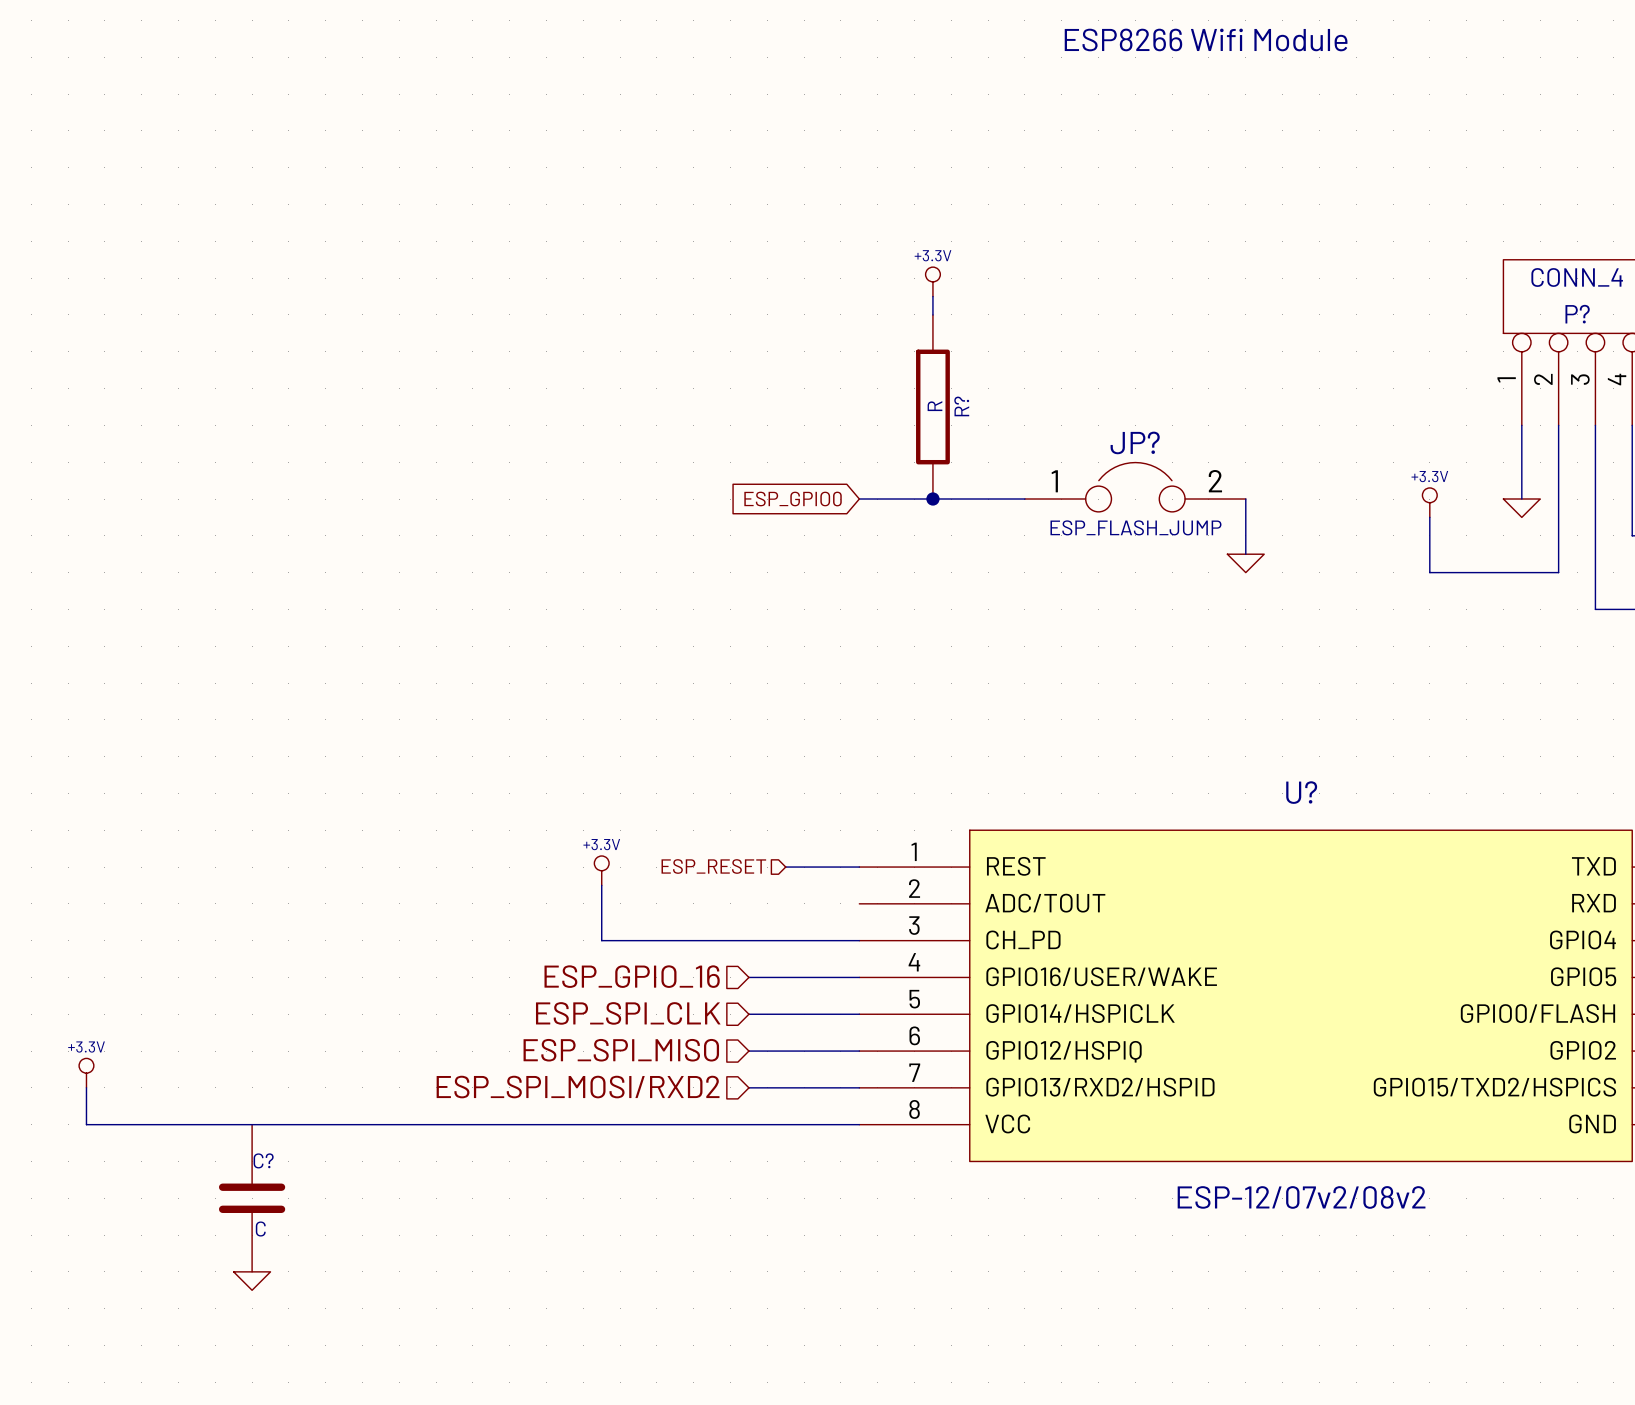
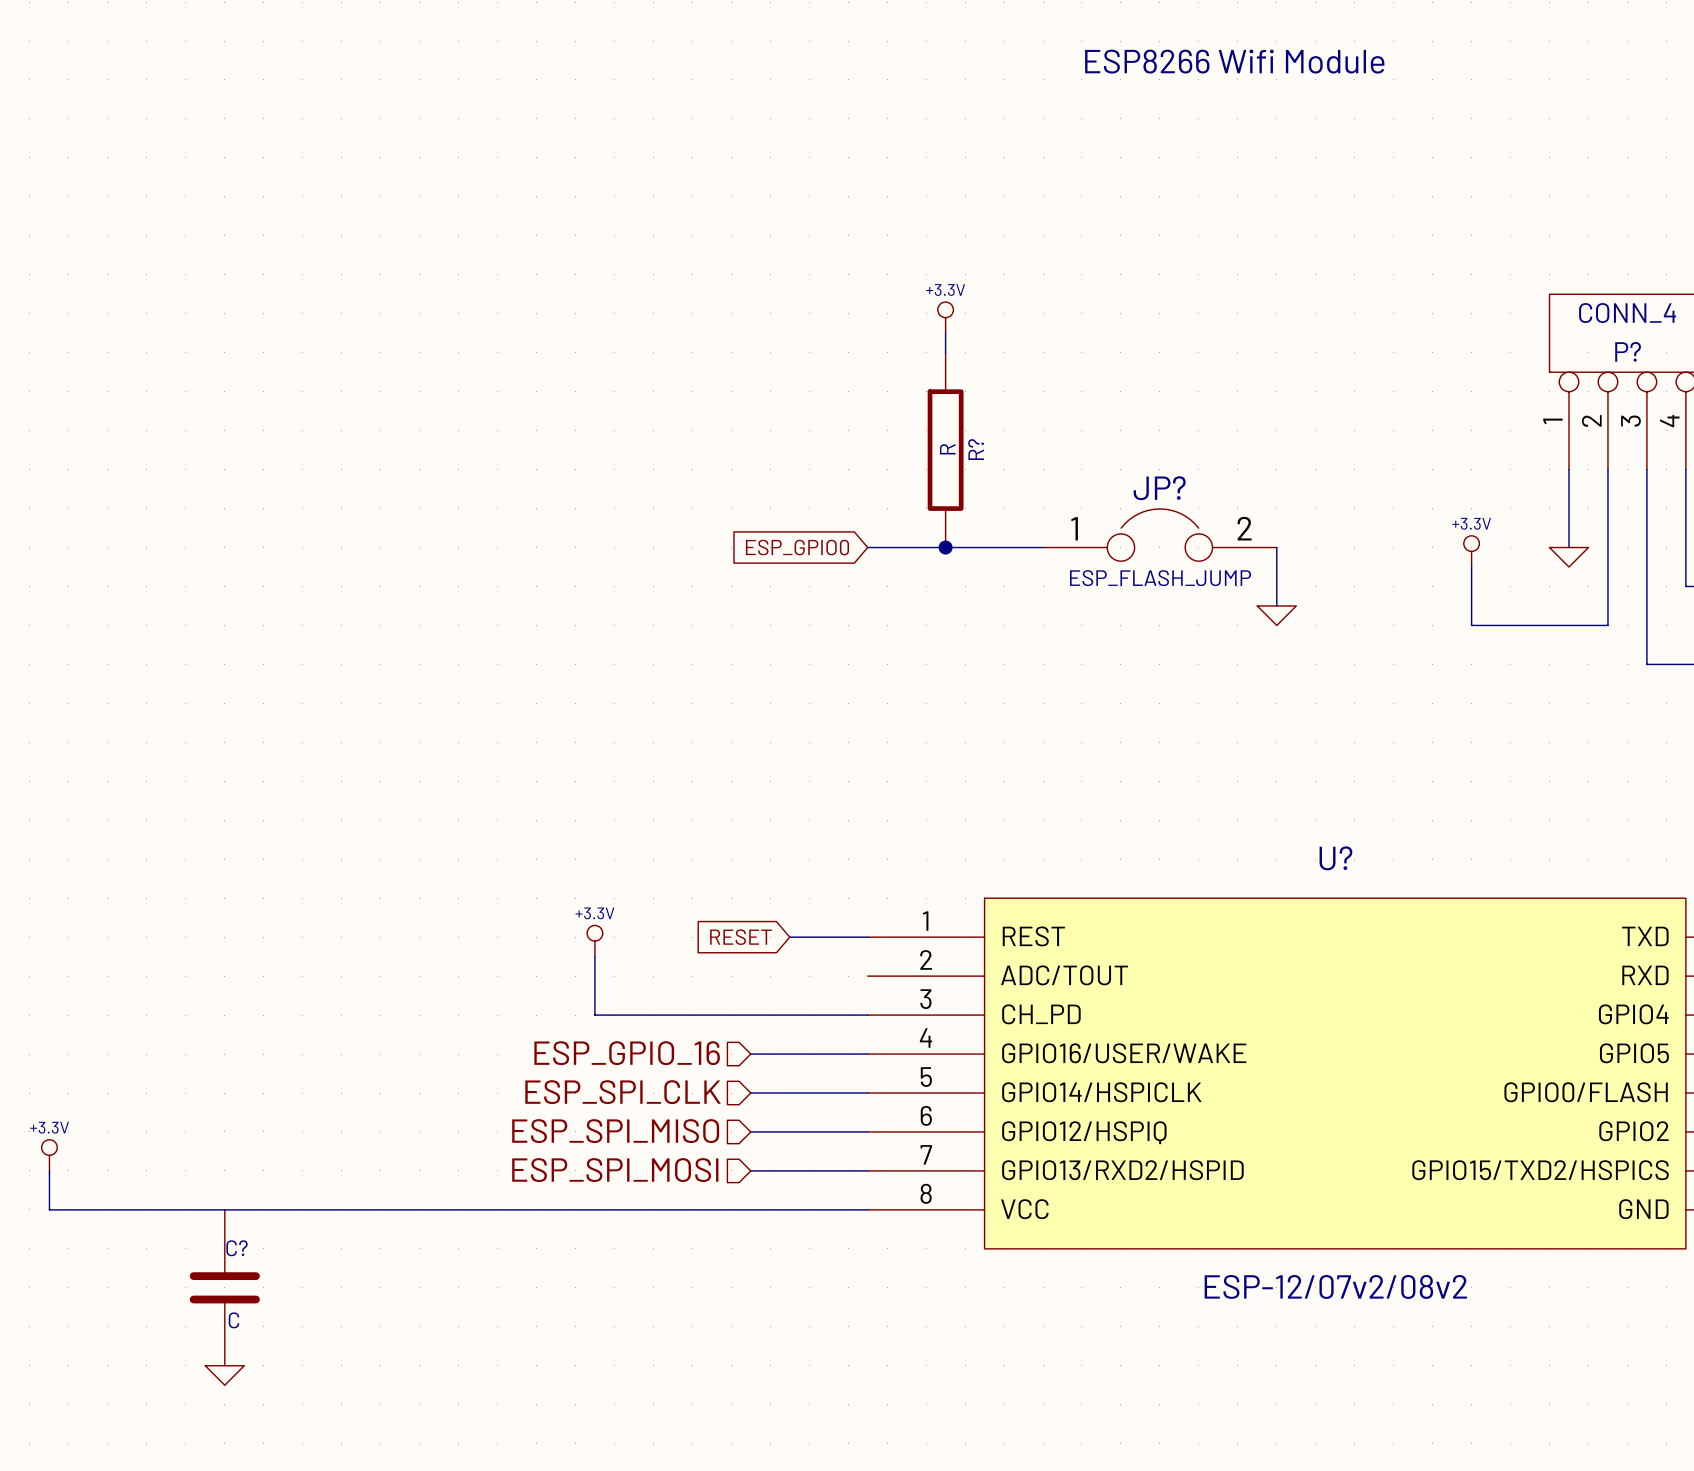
hierarchical label: ESP_RESET (713, 866) -> none
global label: none -> RESET (740, 937)
hierarchical label: ESP_SPI_MOSI/RXD2 (578, 1087) -> ESP_SPI_MOSI (615, 1170)

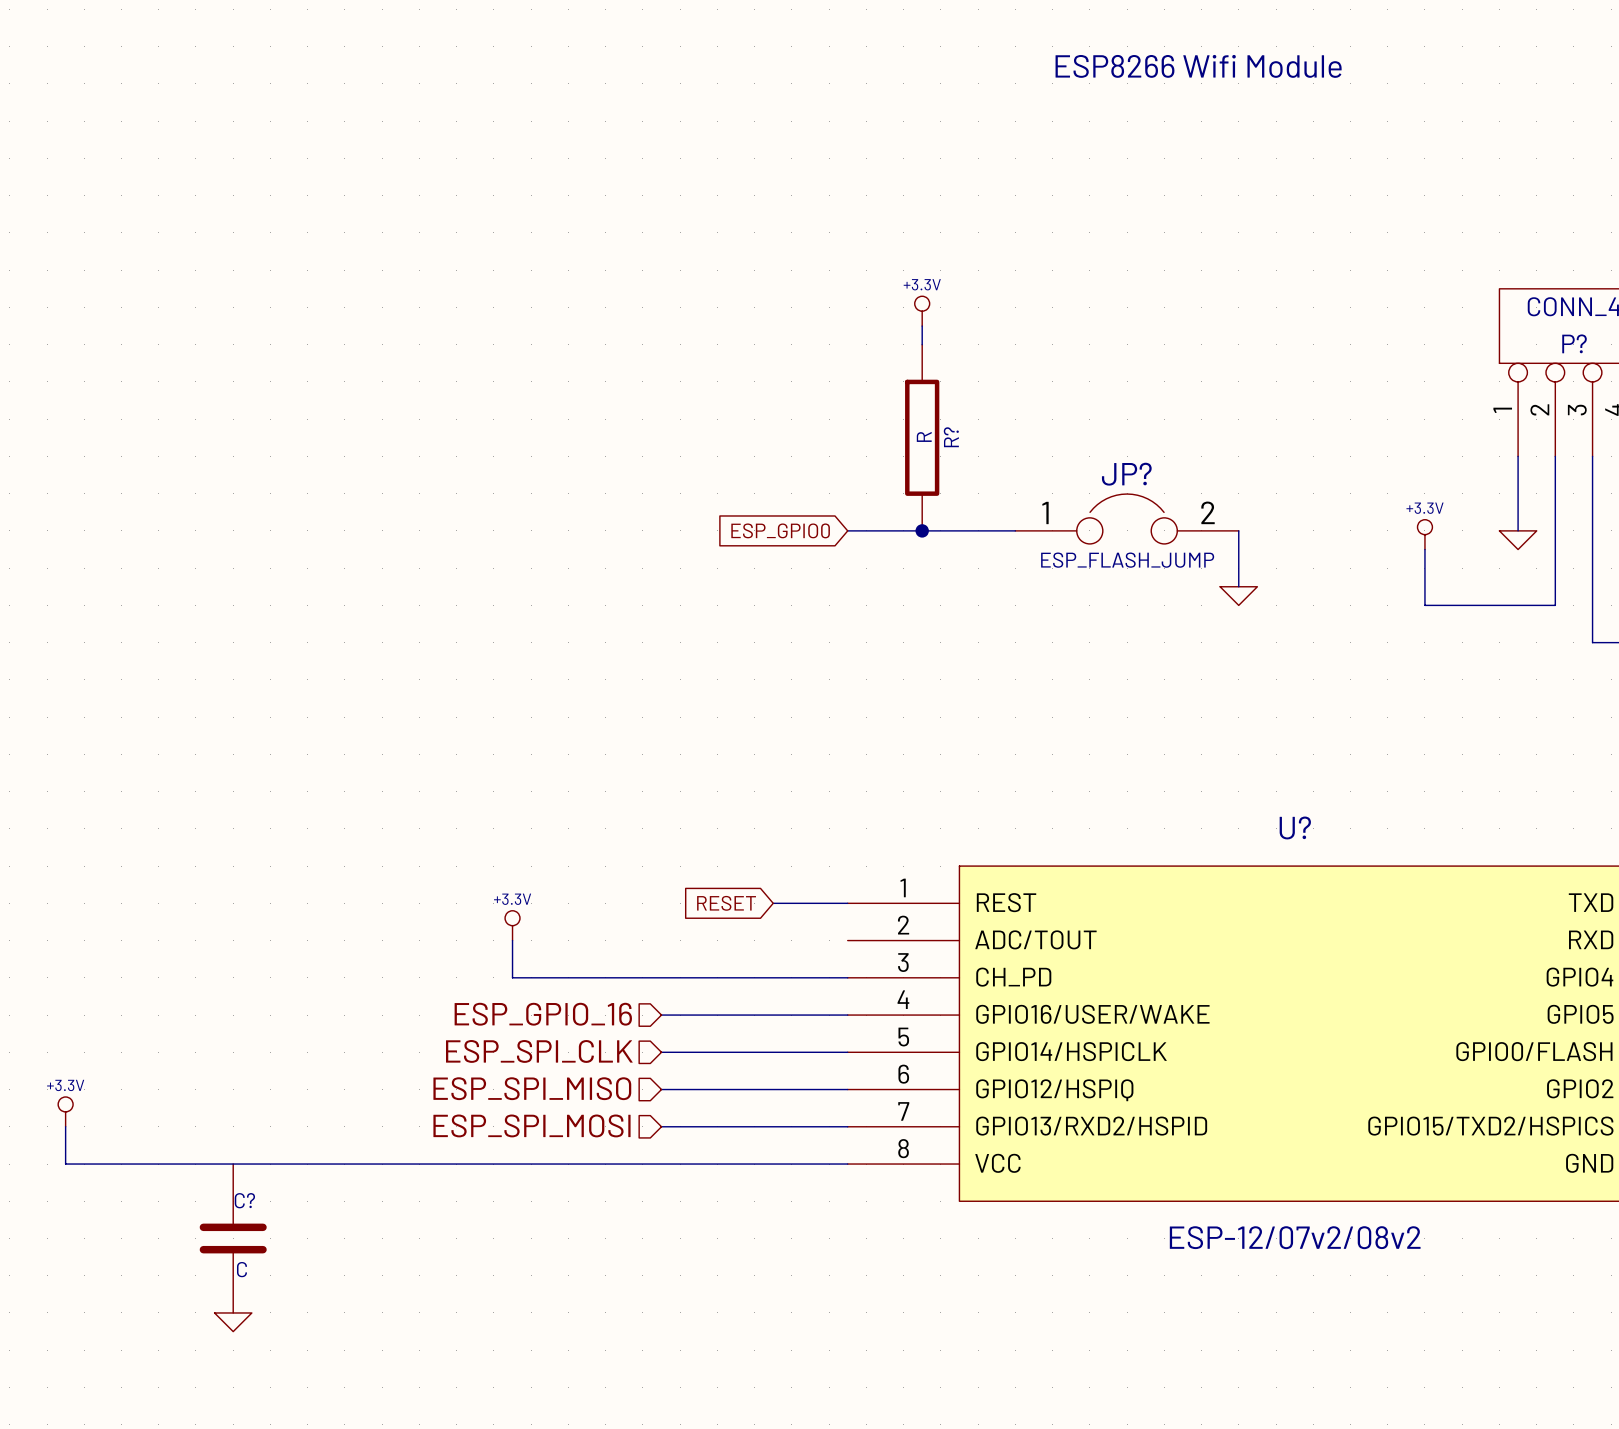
power symbol position: +3.3V (594, 941) -> +3.3V (512, 925)
wire: (594, 956) (594, 1015) -> (512, 940) (512, 977) (587, 977)
hierarchical label position: ESP_GPIO_16 (627, 1053) -> ESP_GPIO_16 (543, 1014)
wire: none -> (661, 1015) (735, 1015)
hierarchical label position: ESP_SPI_CLK (623, 1092) -> ESP_SPI_CLK (539, 1051)
wire: none -> (661, 1052) (735, 1052)
hierarchical label position: ESP_SPI_MISO (615, 1131) -> ESP_SPI_MISO (532, 1088)
wire: none -> (661, 1089) (735, 1089)
hierarchical label position: ESP_SPI_MOSI (615, 1170) -> ESP_SPI_MOSI (531, 1125)
wire: none -> (661, 1126) (735, 1126)

